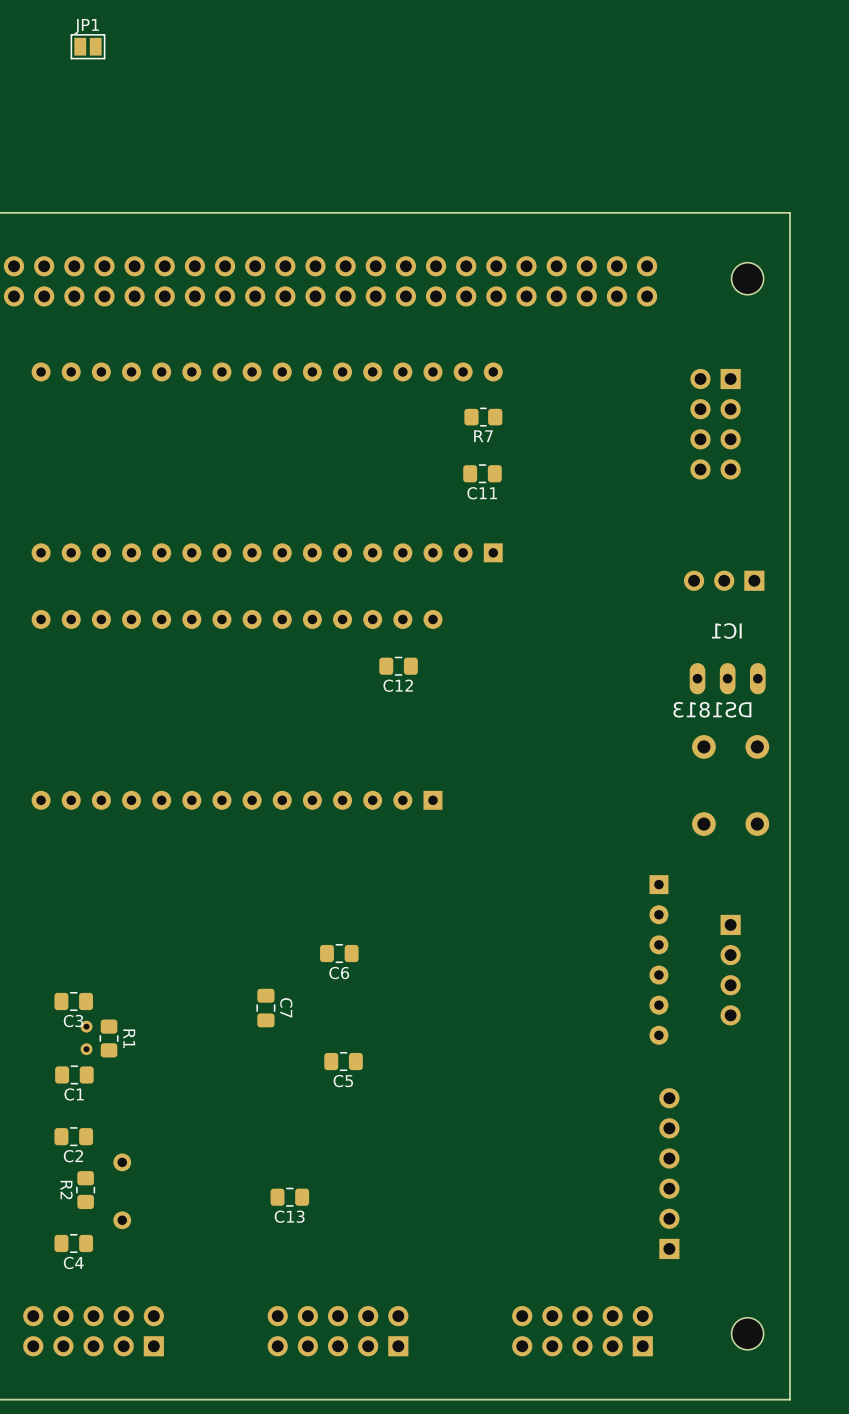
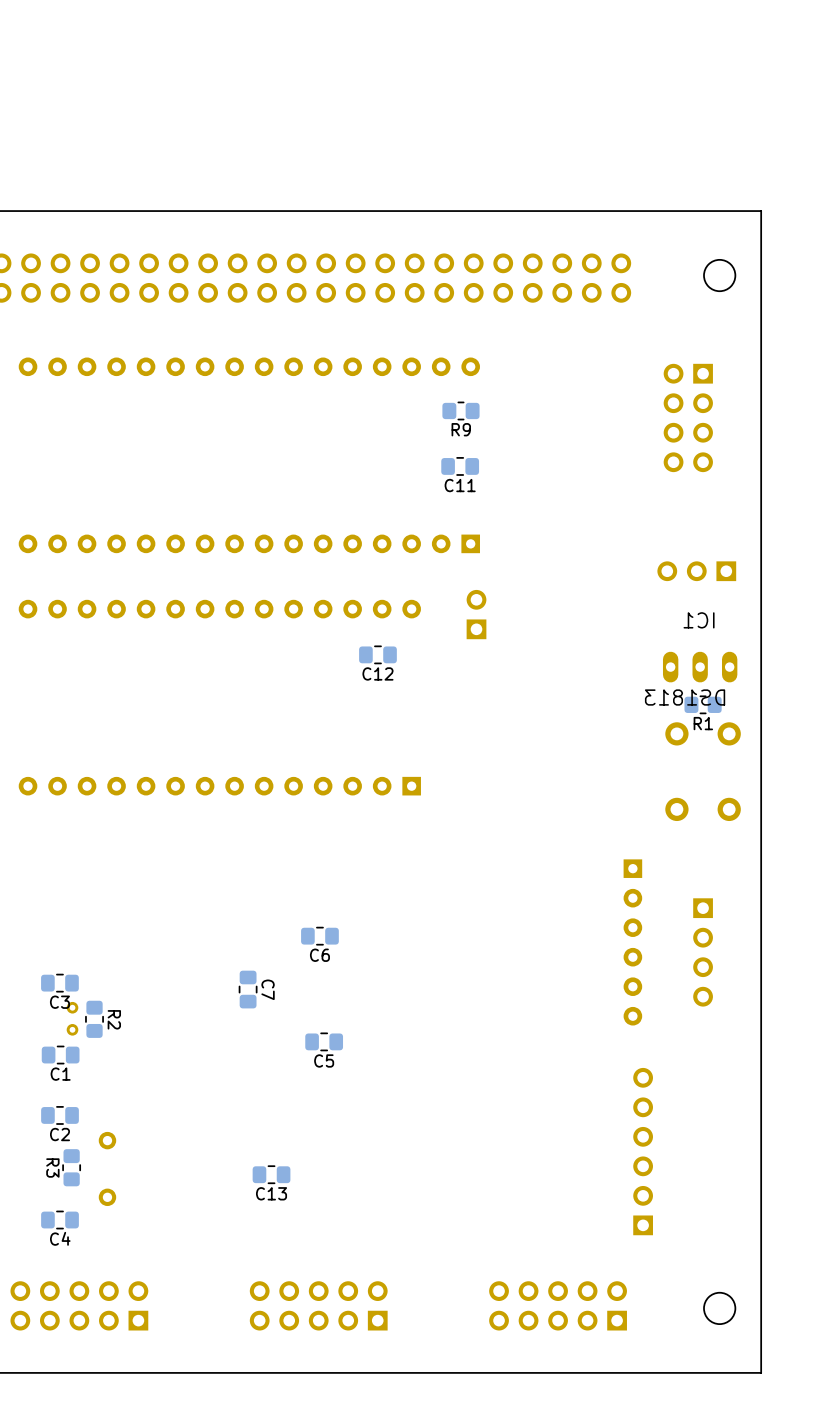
JP1: (87, 46) -> none
R7 name: R7 (483, 436) -> R9 (461, 429)
part: none -> (476, 614)
R1: none -> (703, 704)
R1 name: R1 (129, 1038) -> R2 (114, 1019)
R2 name: R2 (66, 1190) -> R3 (52, 1168)

